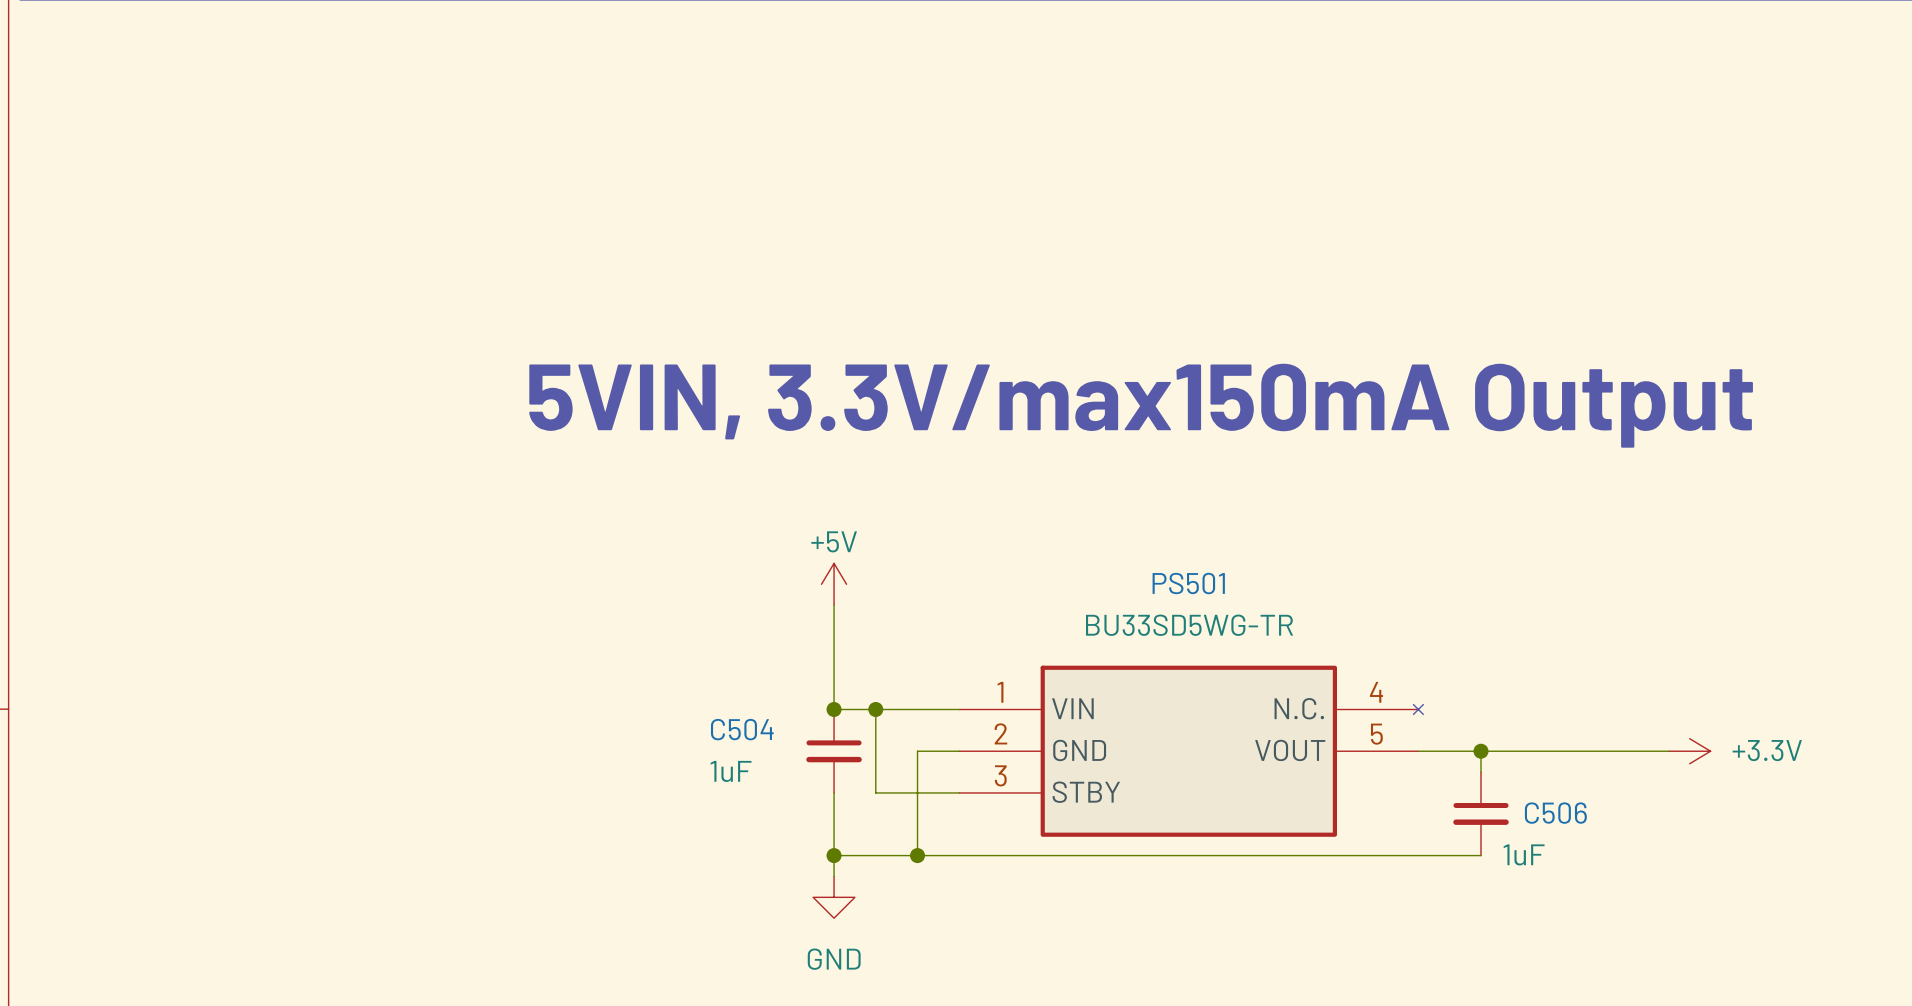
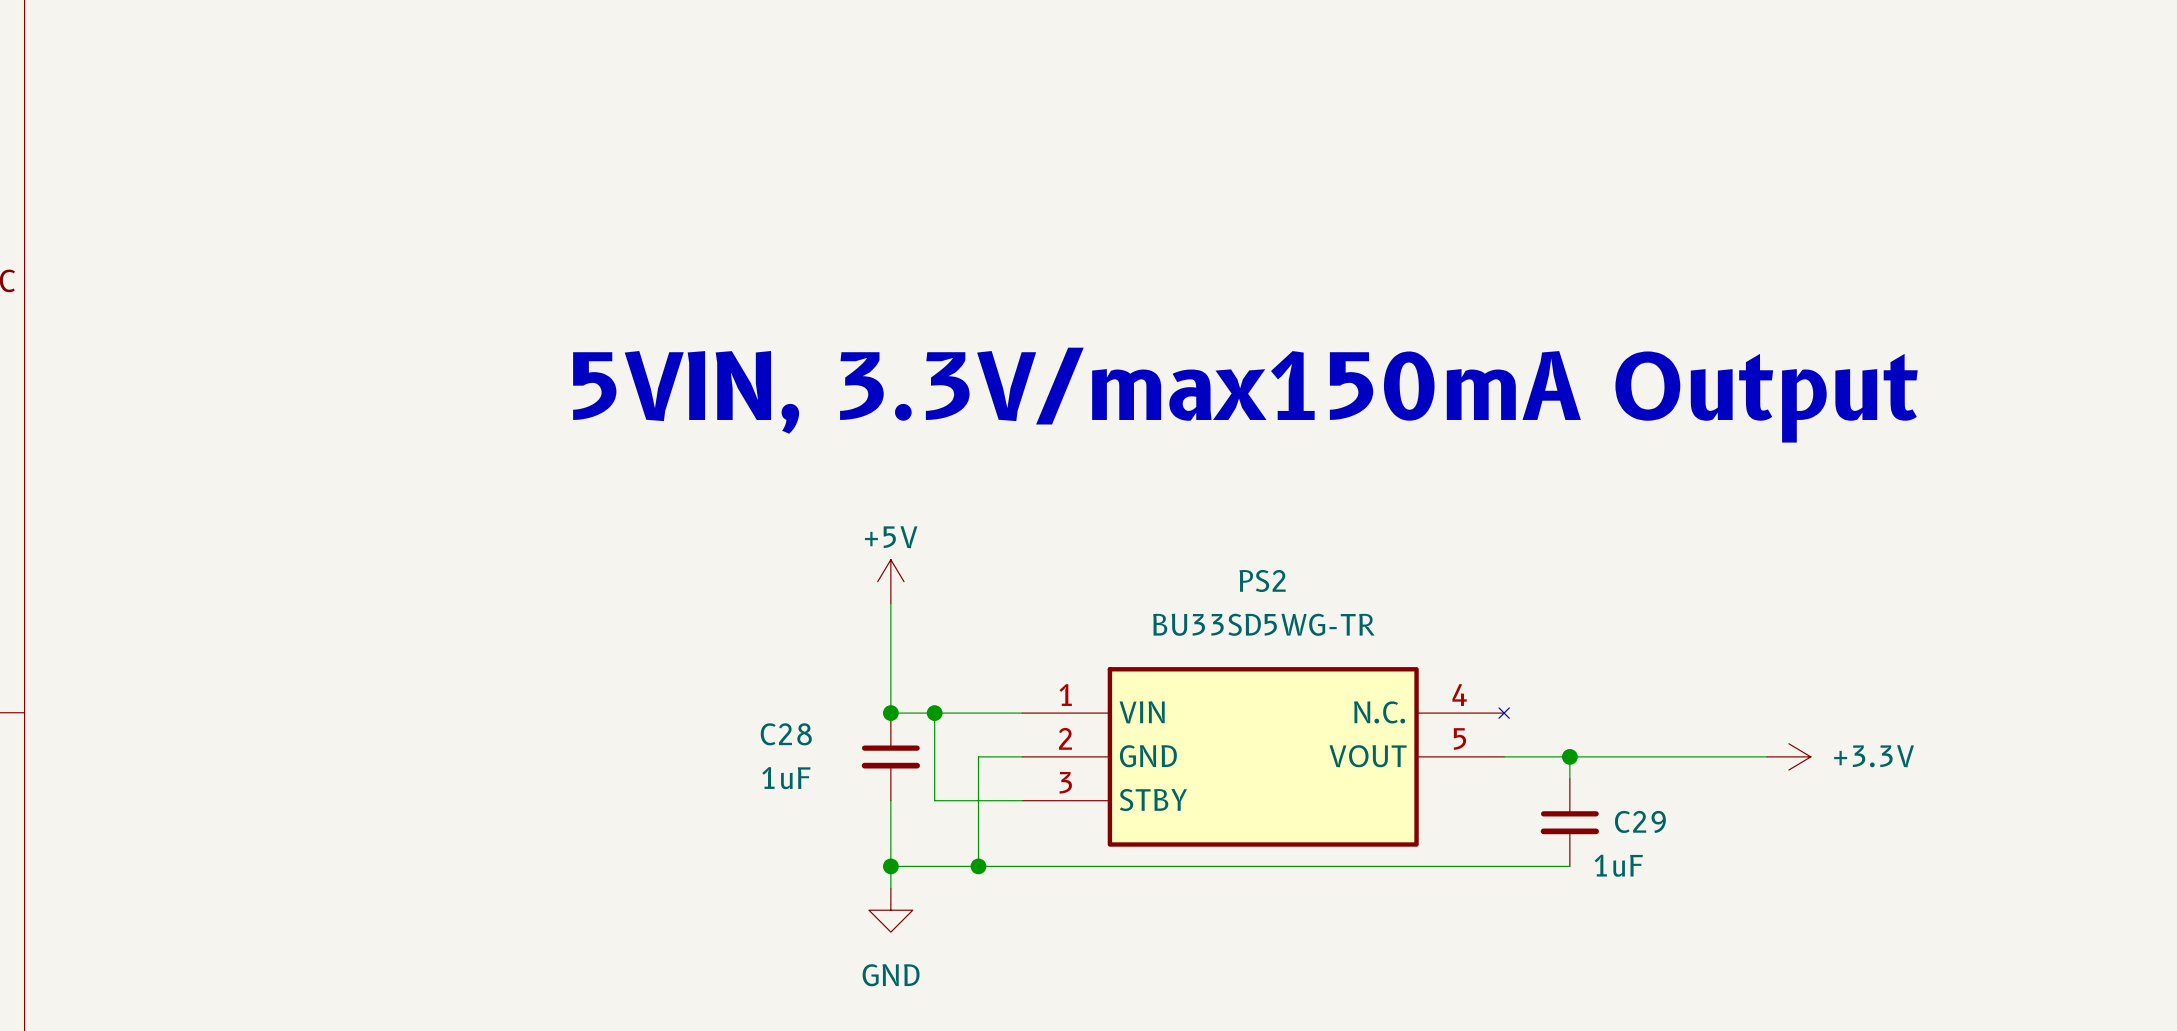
PS501 name: PS501 (1188, 583) -> PS2 (1262, 580)
C504 name: C504 (742, 729) -> C28 (786, 734)
C506 name: C506 (1555, 813) -> C29 (1640, 821)

